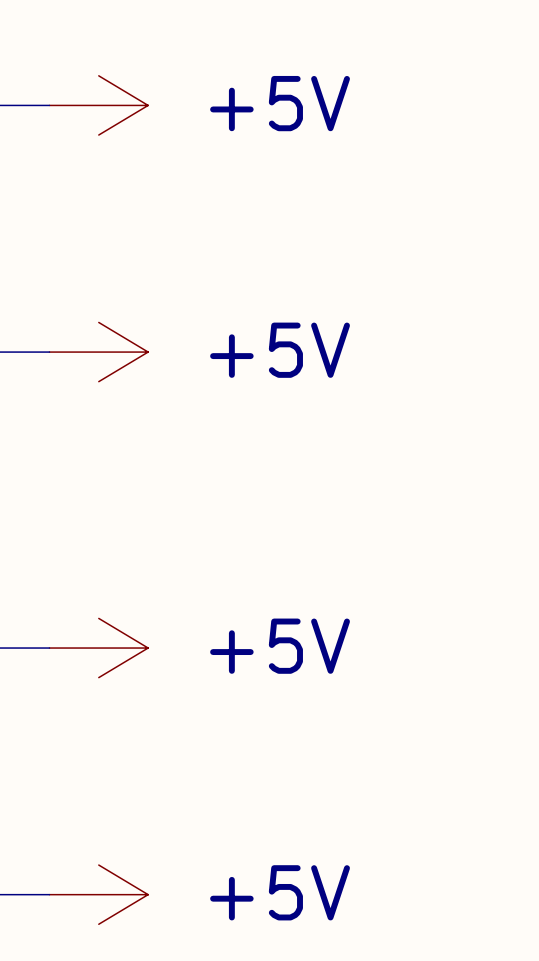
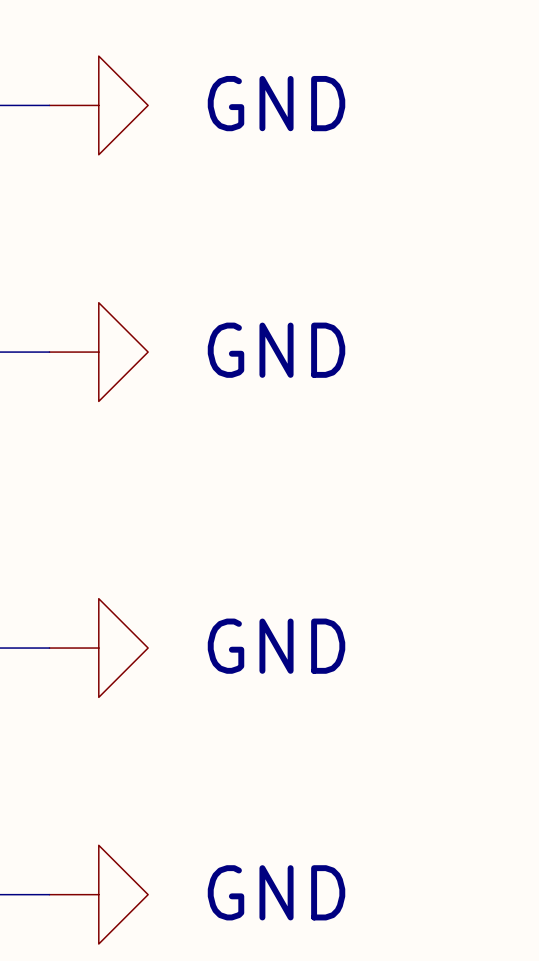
power symbol: +5V (98, 105) -> GND (98, 105)
power symbol: +5V (98, 352) -> GND (98, 352)
power symbol: +5V (98, 648) -> GND (98, 648)
power symbol: +5V (98, 894) -> GND (98, 894)

